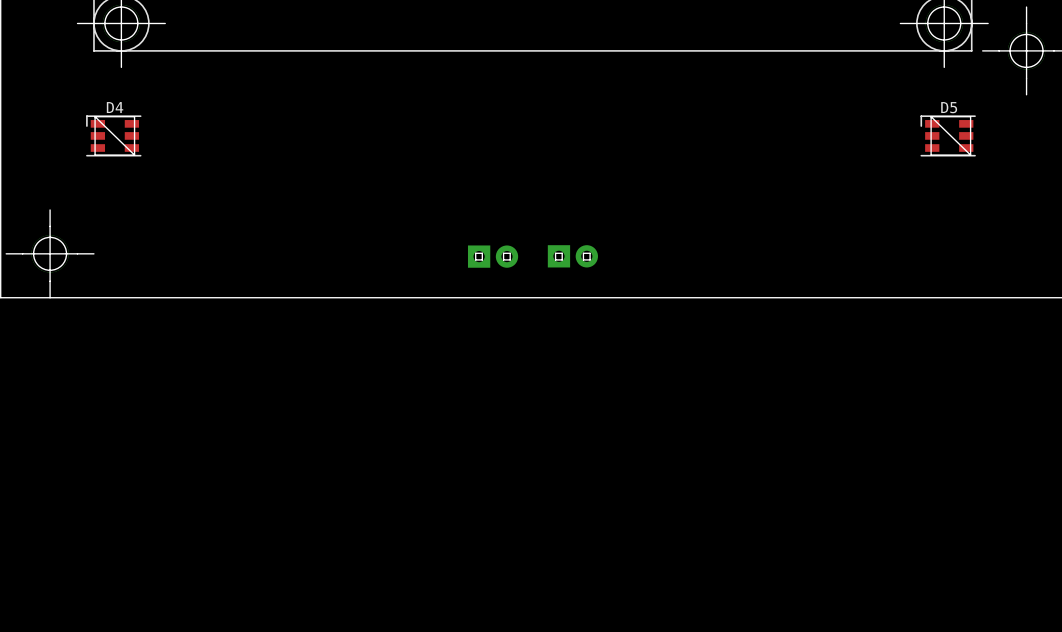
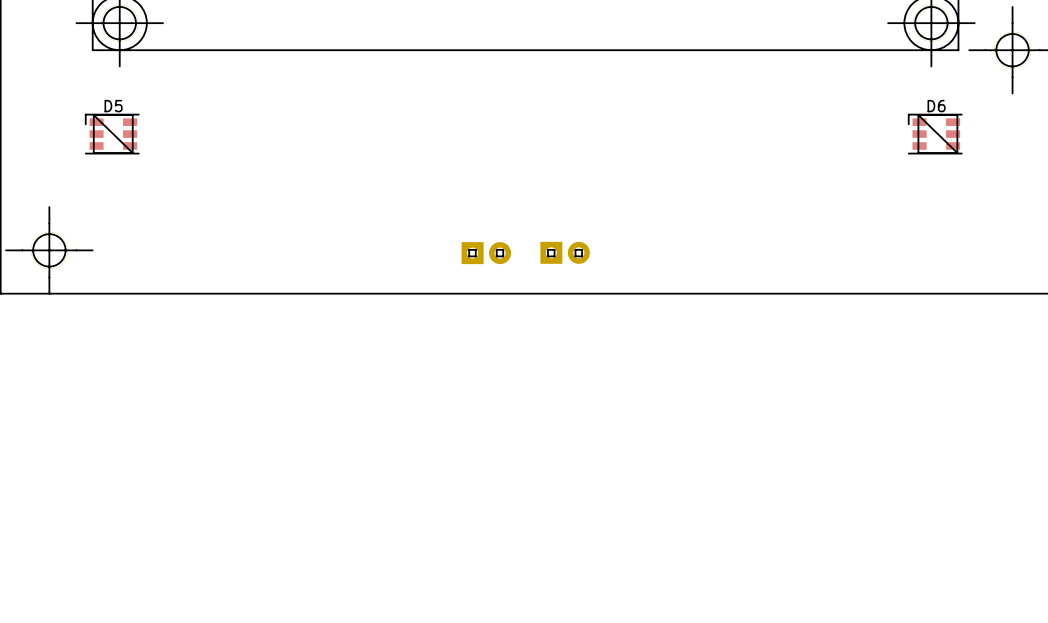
D4 name: D4 (115, 107) -> D5 (113, 106)
D5 name: D5 (949, 107) -> D6 (936, 106)

